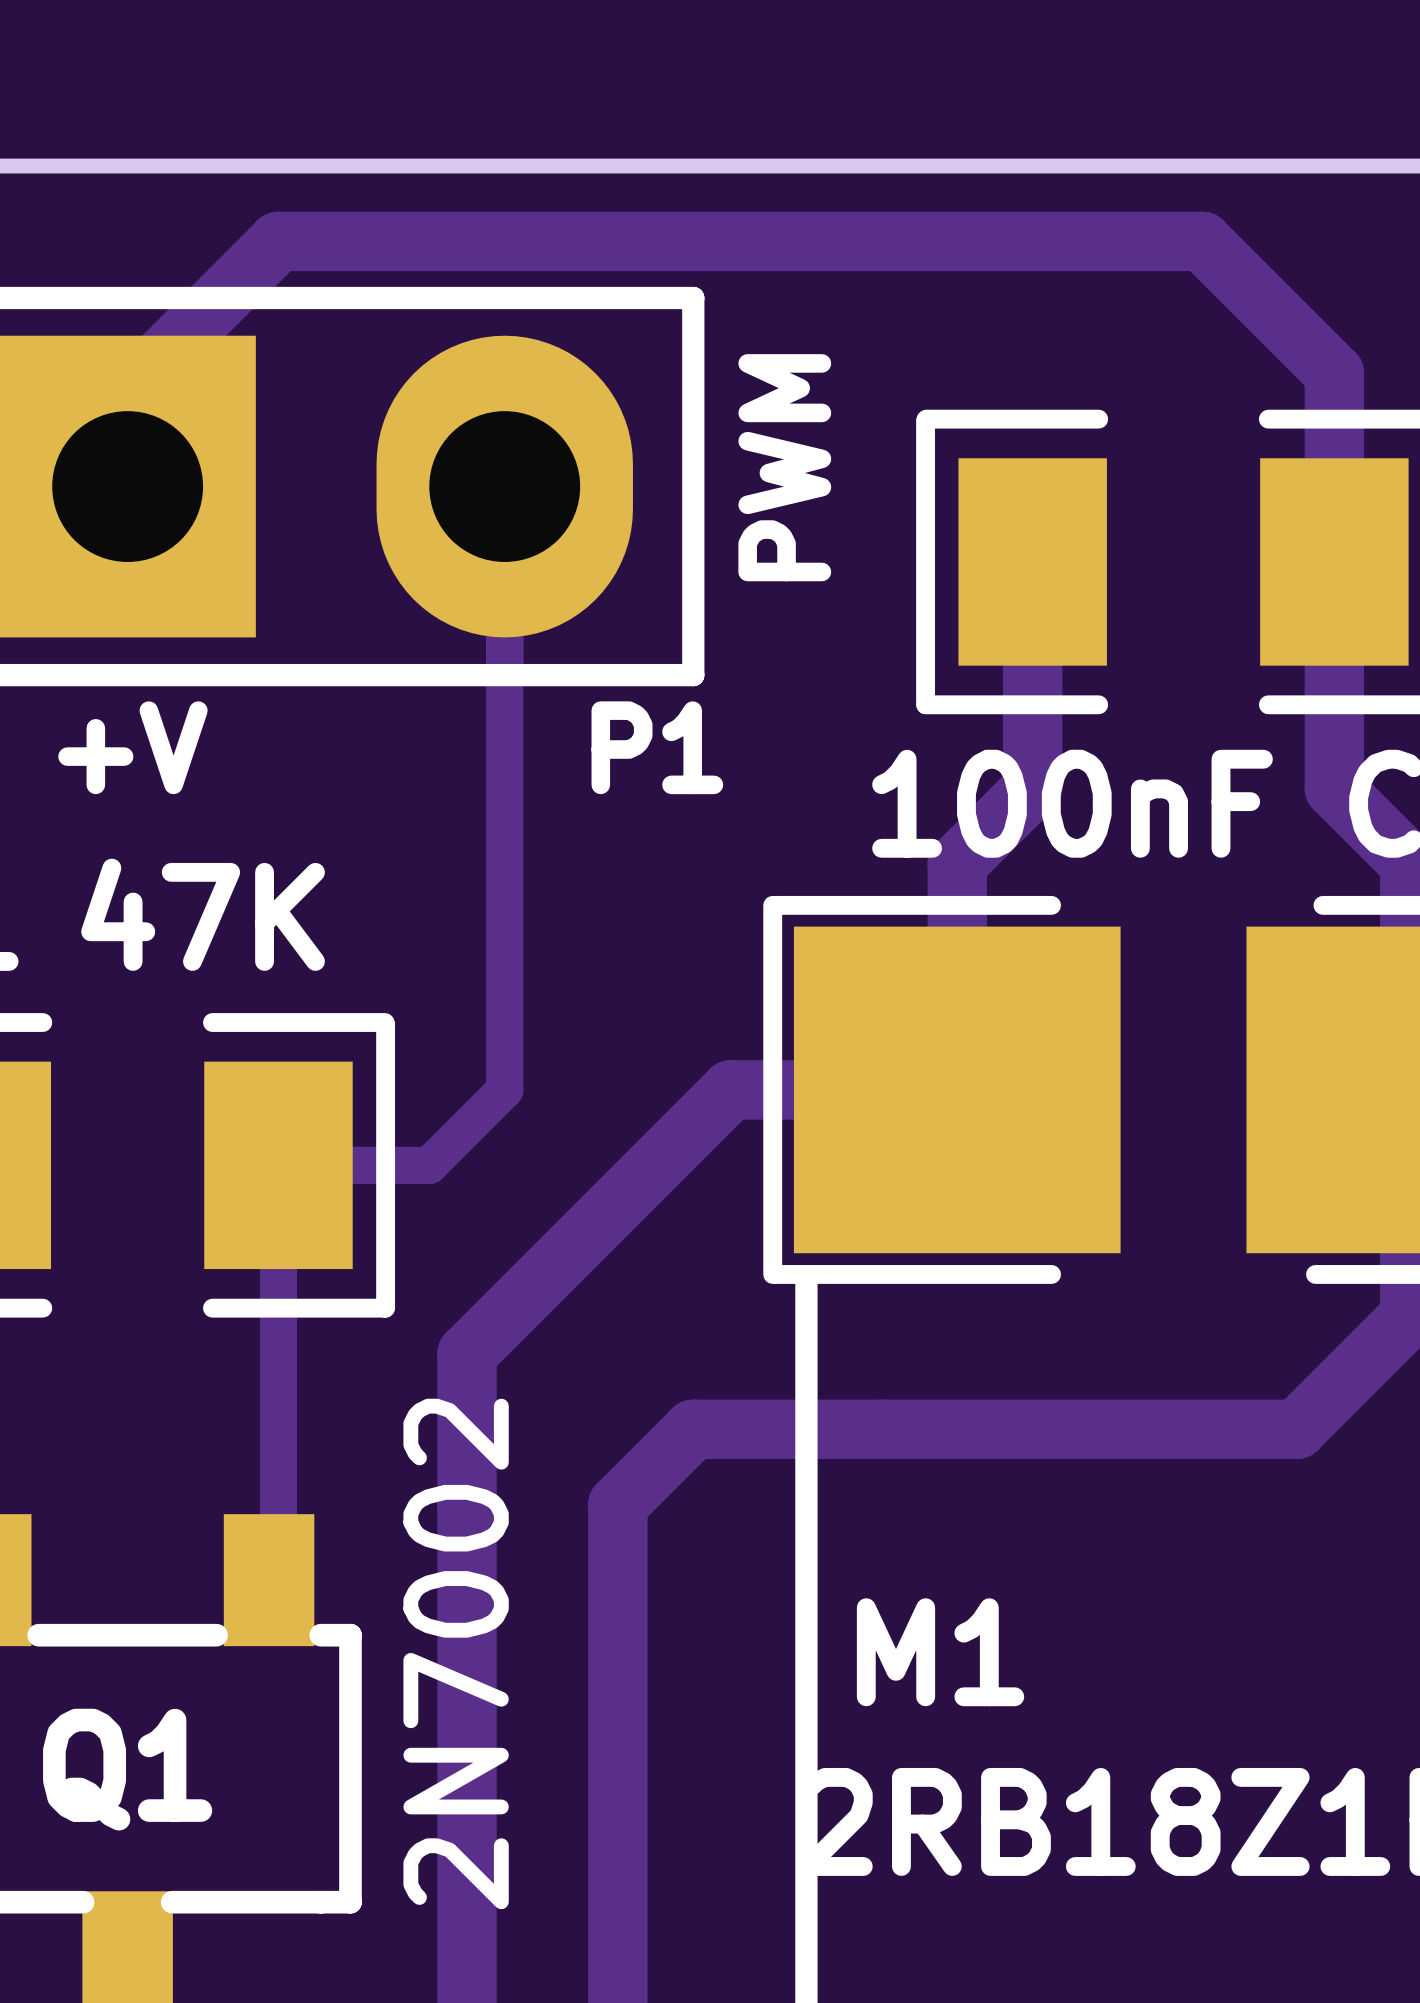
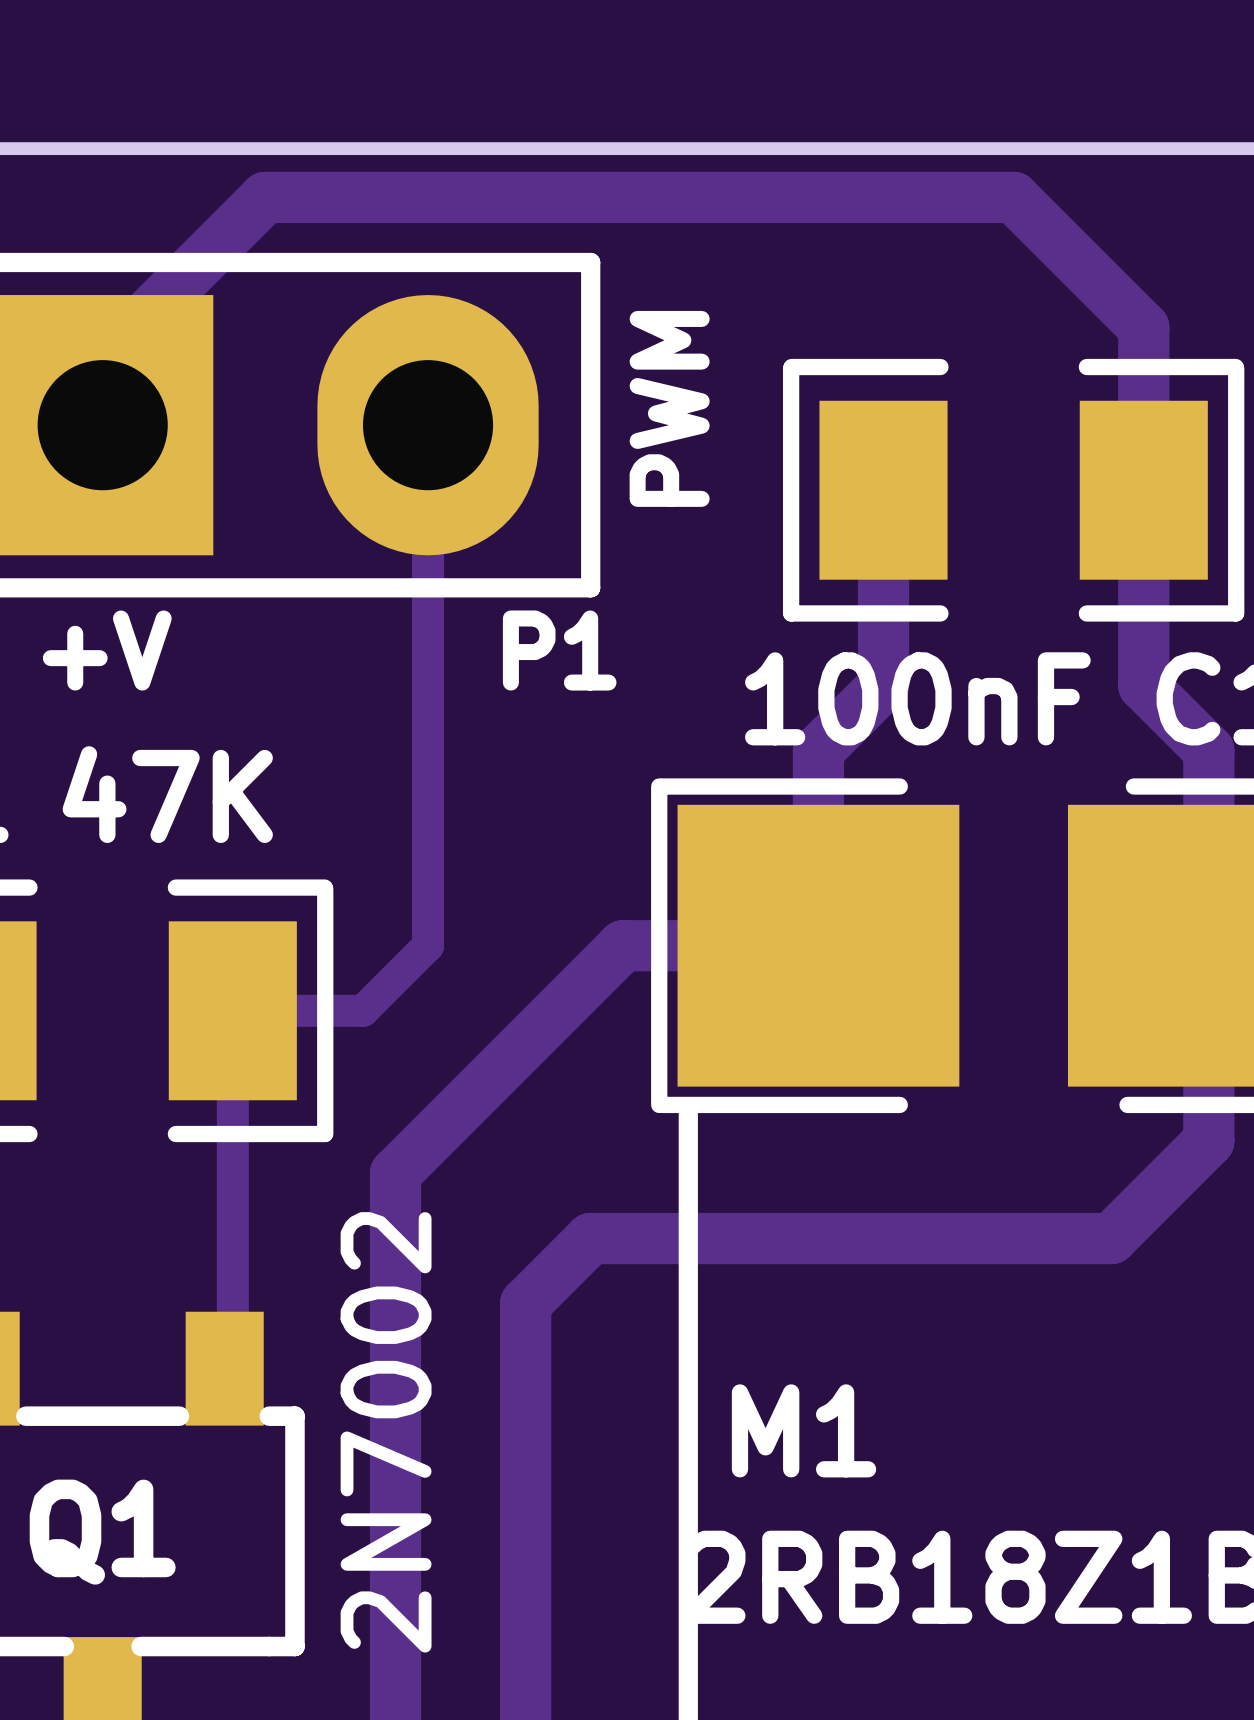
track: (1202, 241) (278, 241) (127, 392) (127, 411) -> (1029, 213) (1013, 197) (265, 197) (102, 360)

